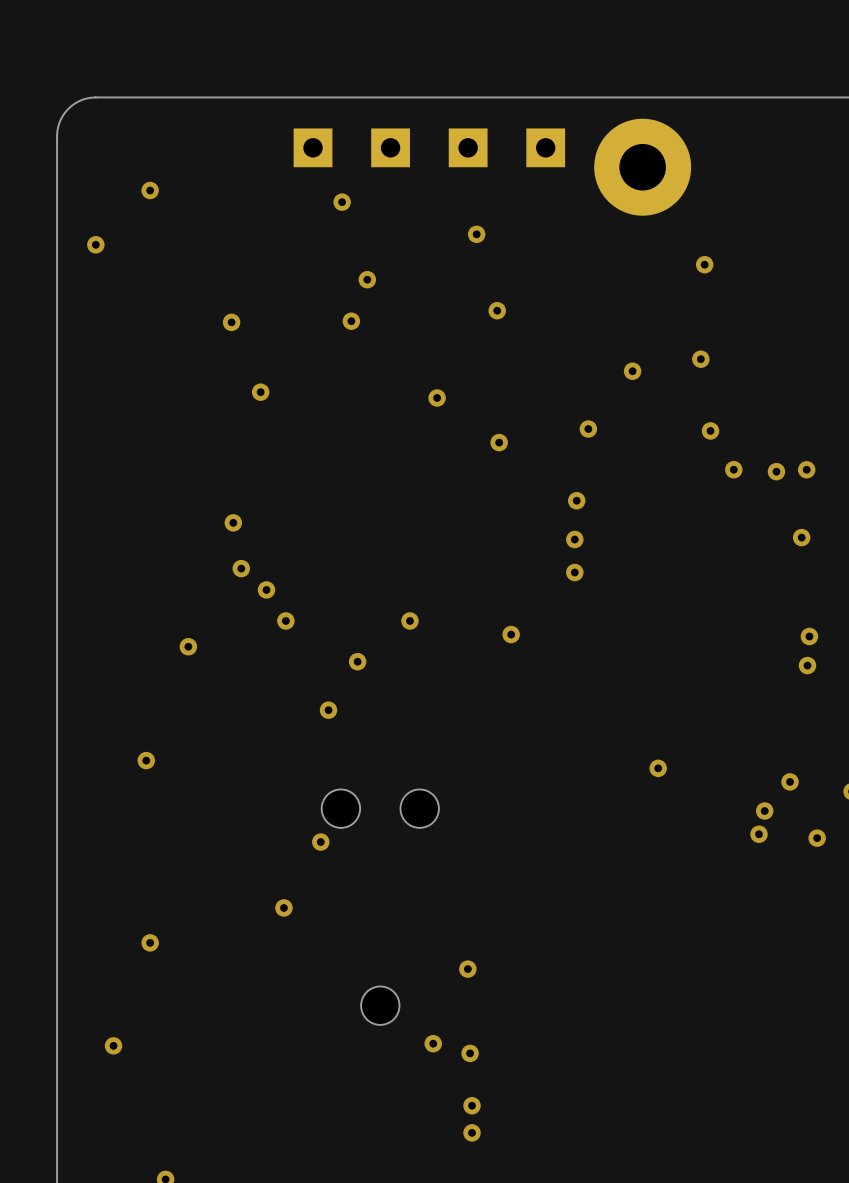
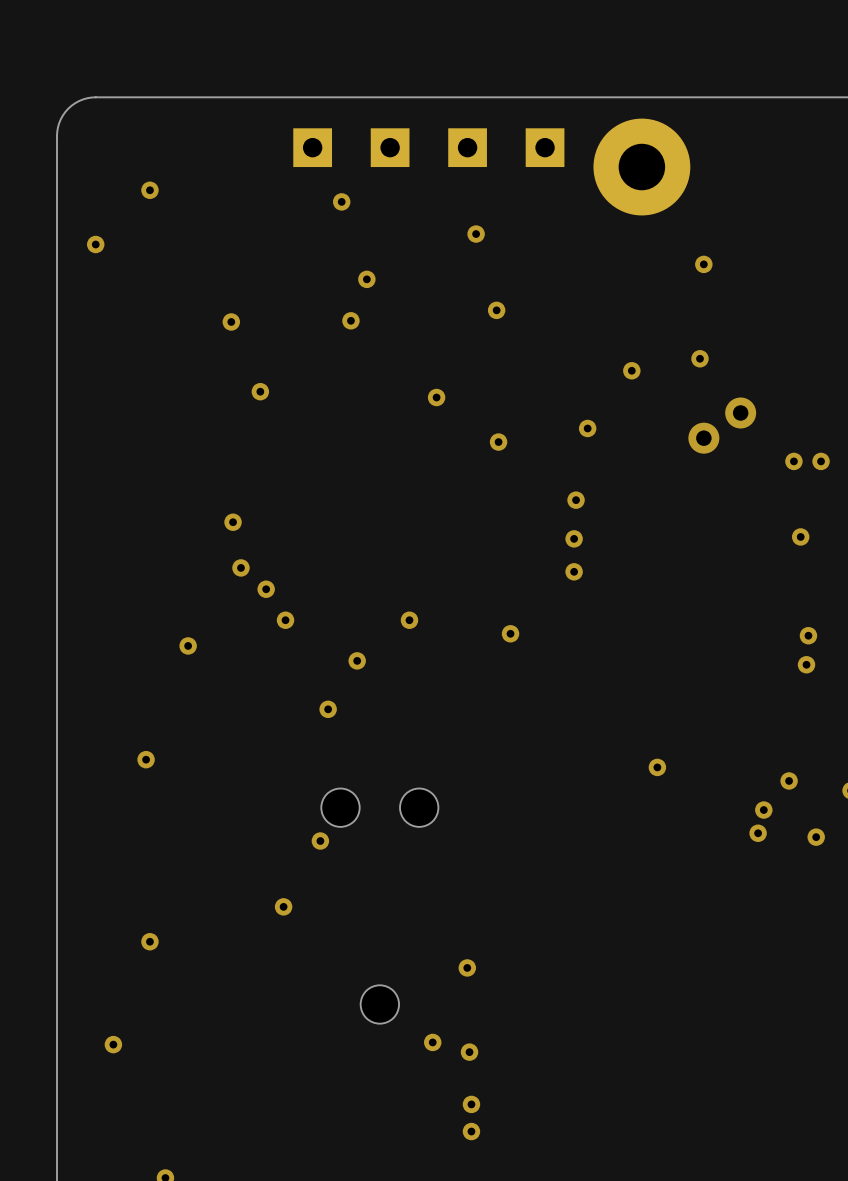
via: none -> (740, 412)
via size: [701, 422, 720, 440] -> [688, 422, 720, 454]
via: none -> (793, 461)
via: none -> (821, 461)
via: (733, 469) -> none
via: (806, 469) -> none
via: (776, 471) -> none

